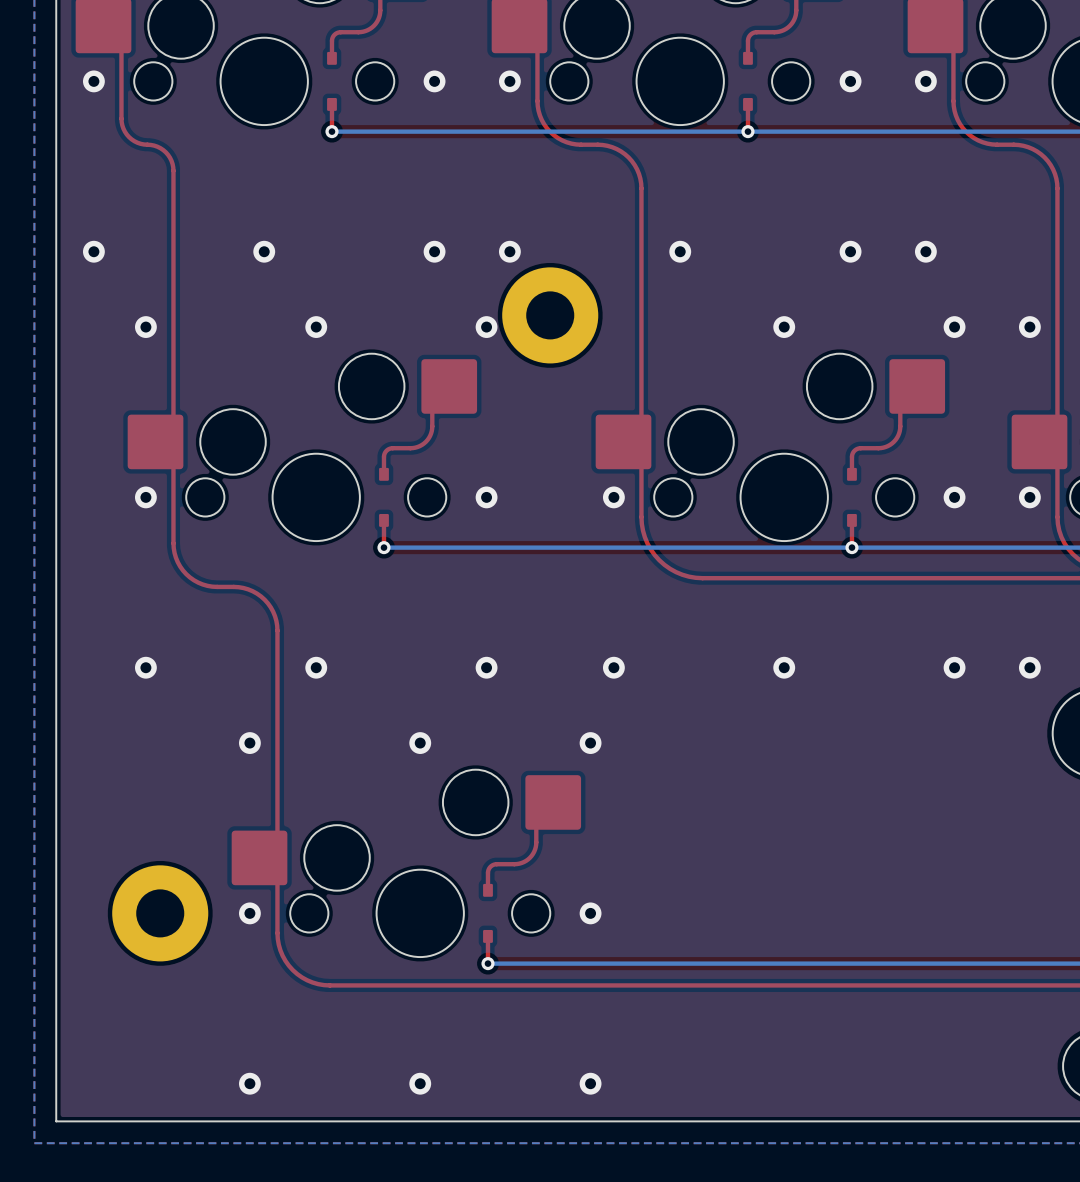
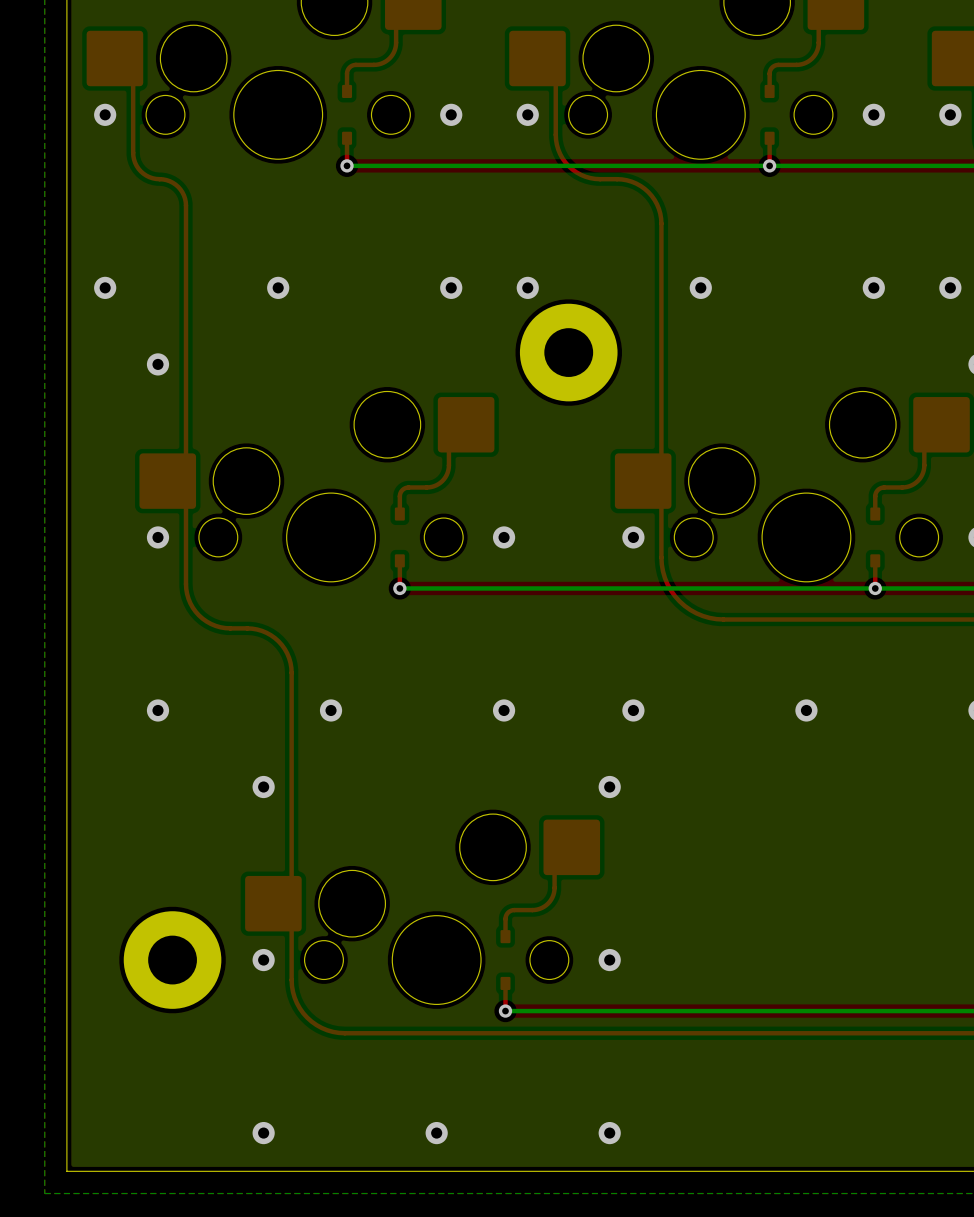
via: (316, 327) -> none
via: (486, 327) -> none
via: (784, 327) -> none
via: (420, 743) -> none

